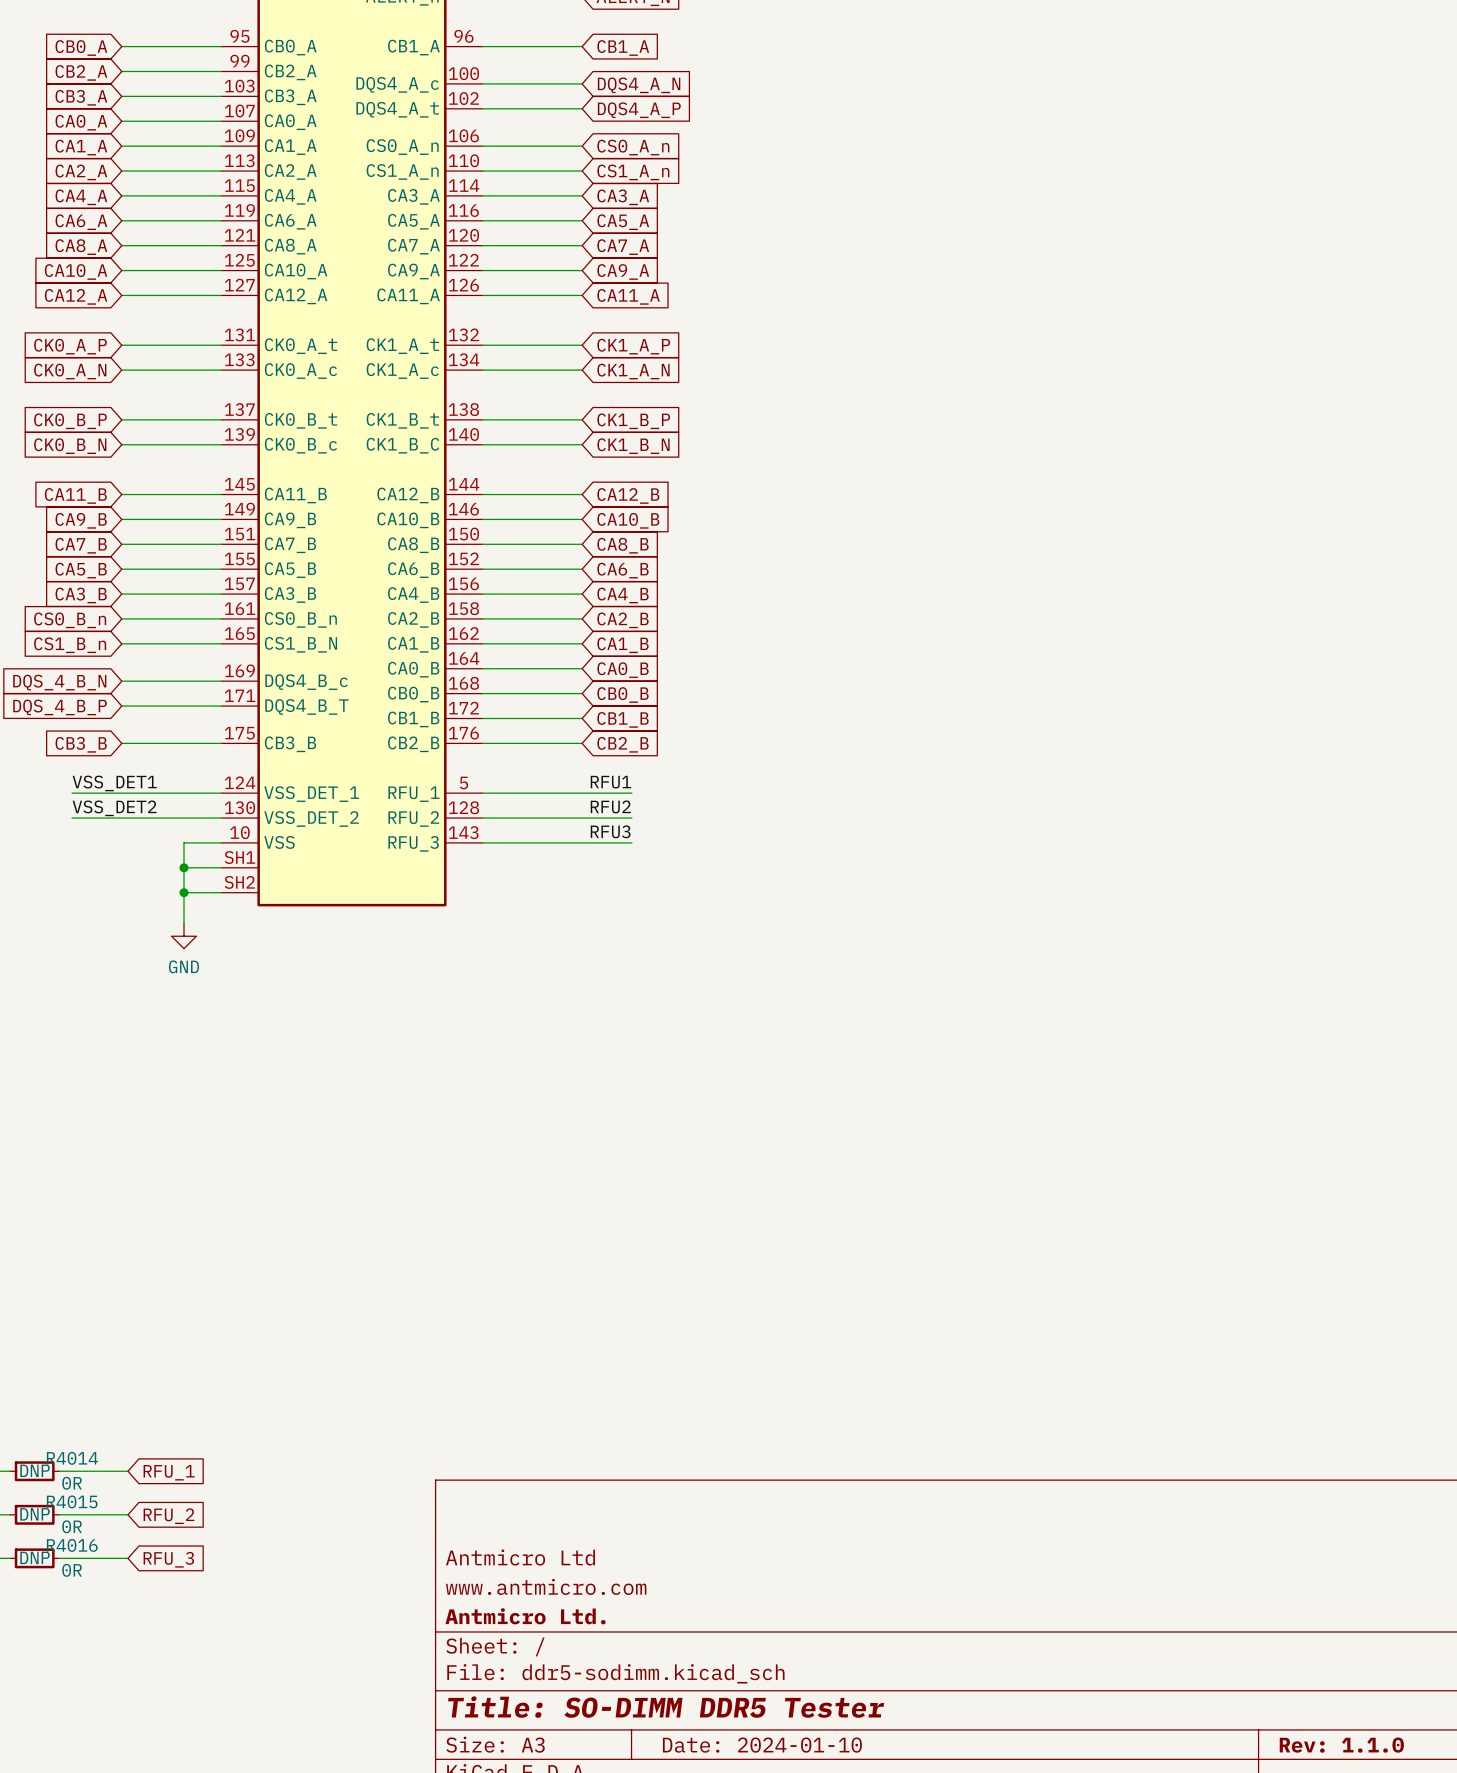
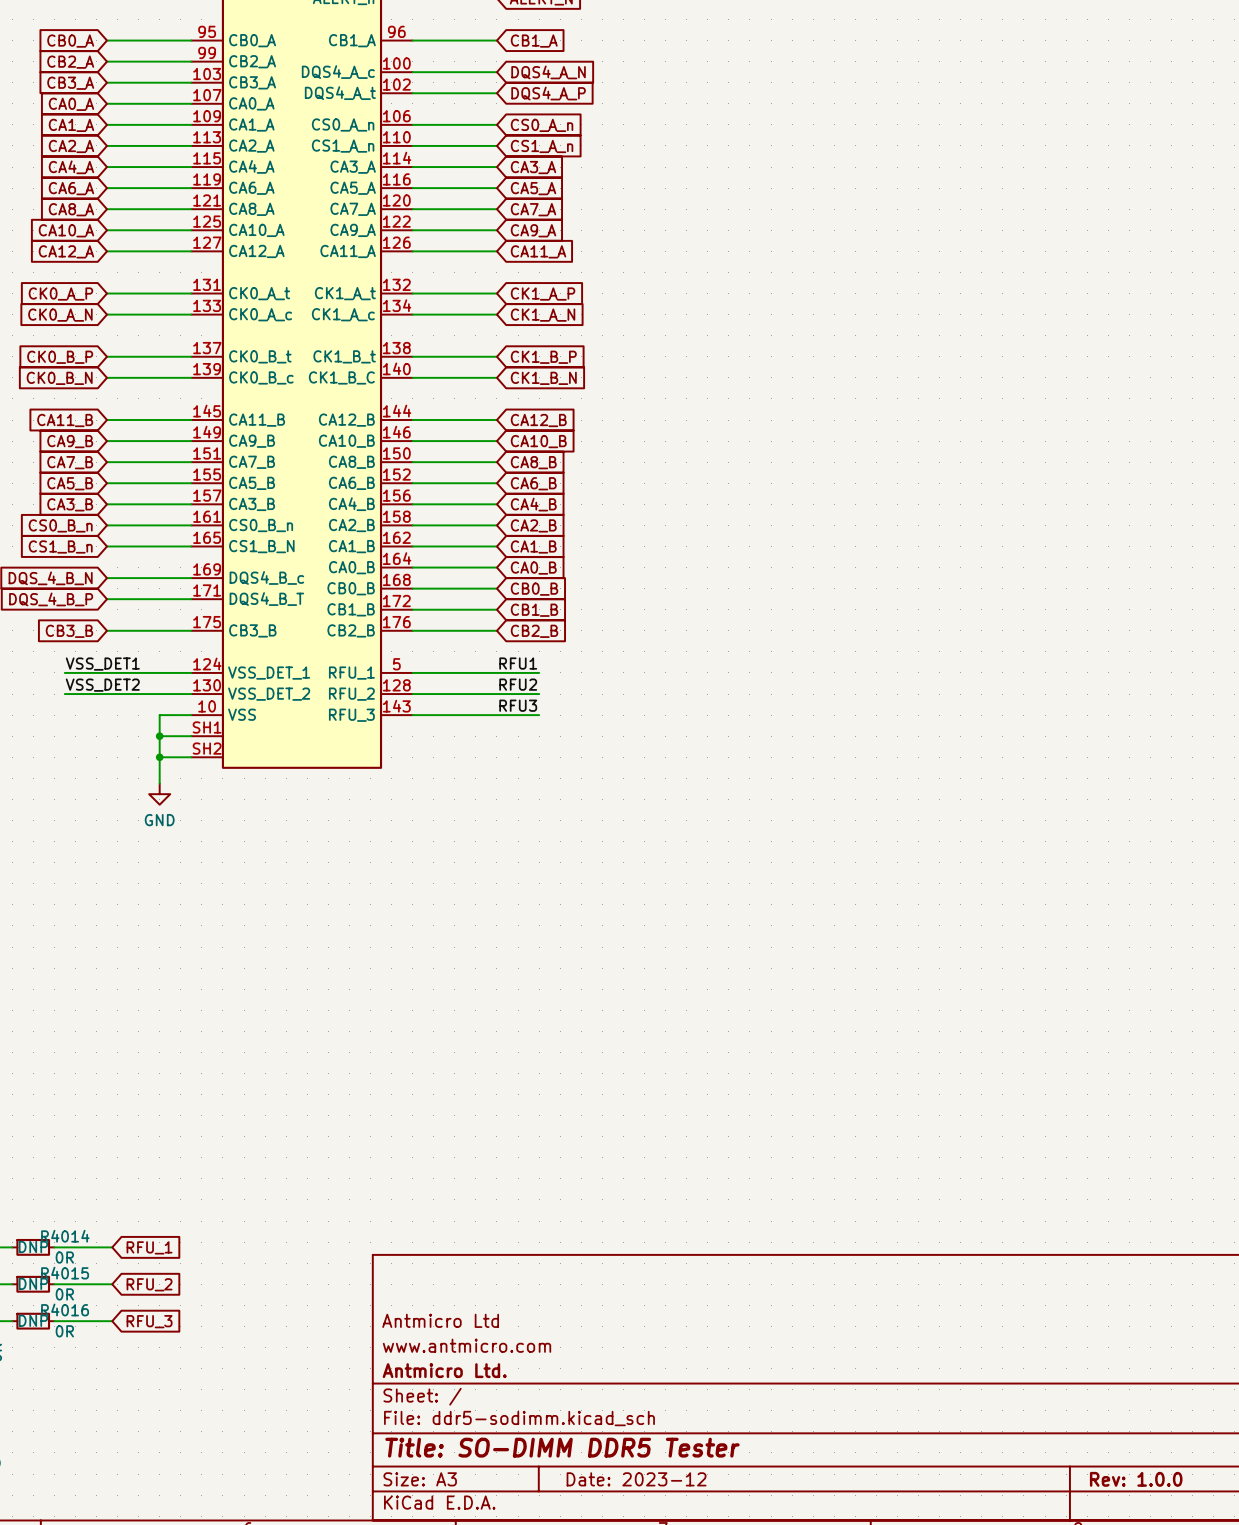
title block: Date: 2024-01-10 (762, 1745) -> Date: 2023-12 (636, 1479)
title block: Rev: 1.1.0 (1341, 1745) -> Rev: 1.0.0 (1136, 1479)

